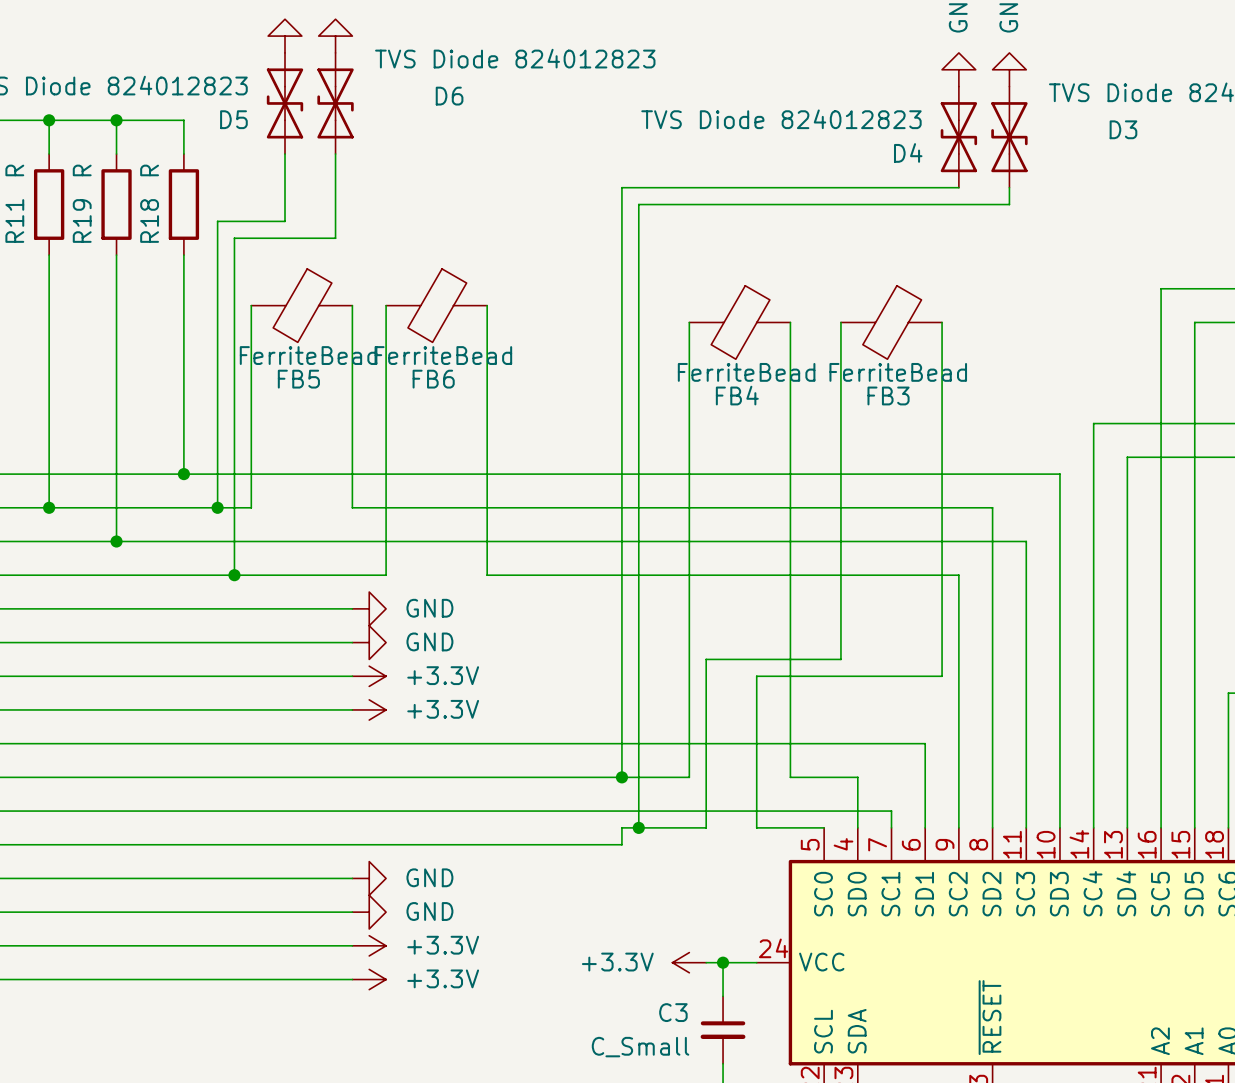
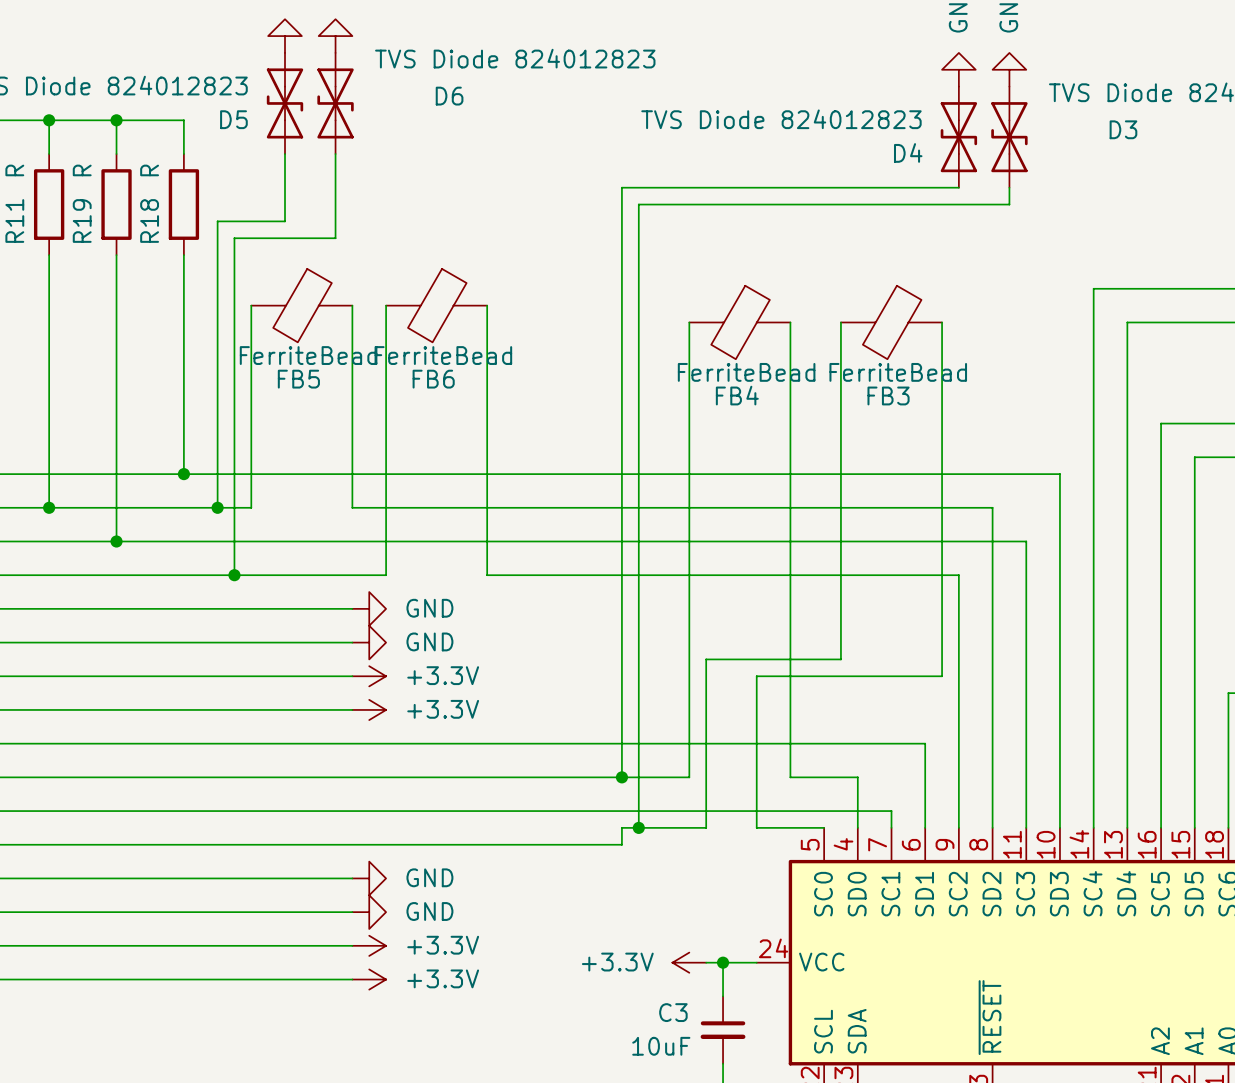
wire: (1161, 288) (1161, 423) (1093, 423) -> (1161, 288) (1093, 288) (1093, 423)
wire: (1194, 322) (1194, 457) (1127, 457) -> (1194, 322) (1127, 322) (1127, 457)
C3 value: C_Small (640, 1047) -> 10uF (661, 1046)

